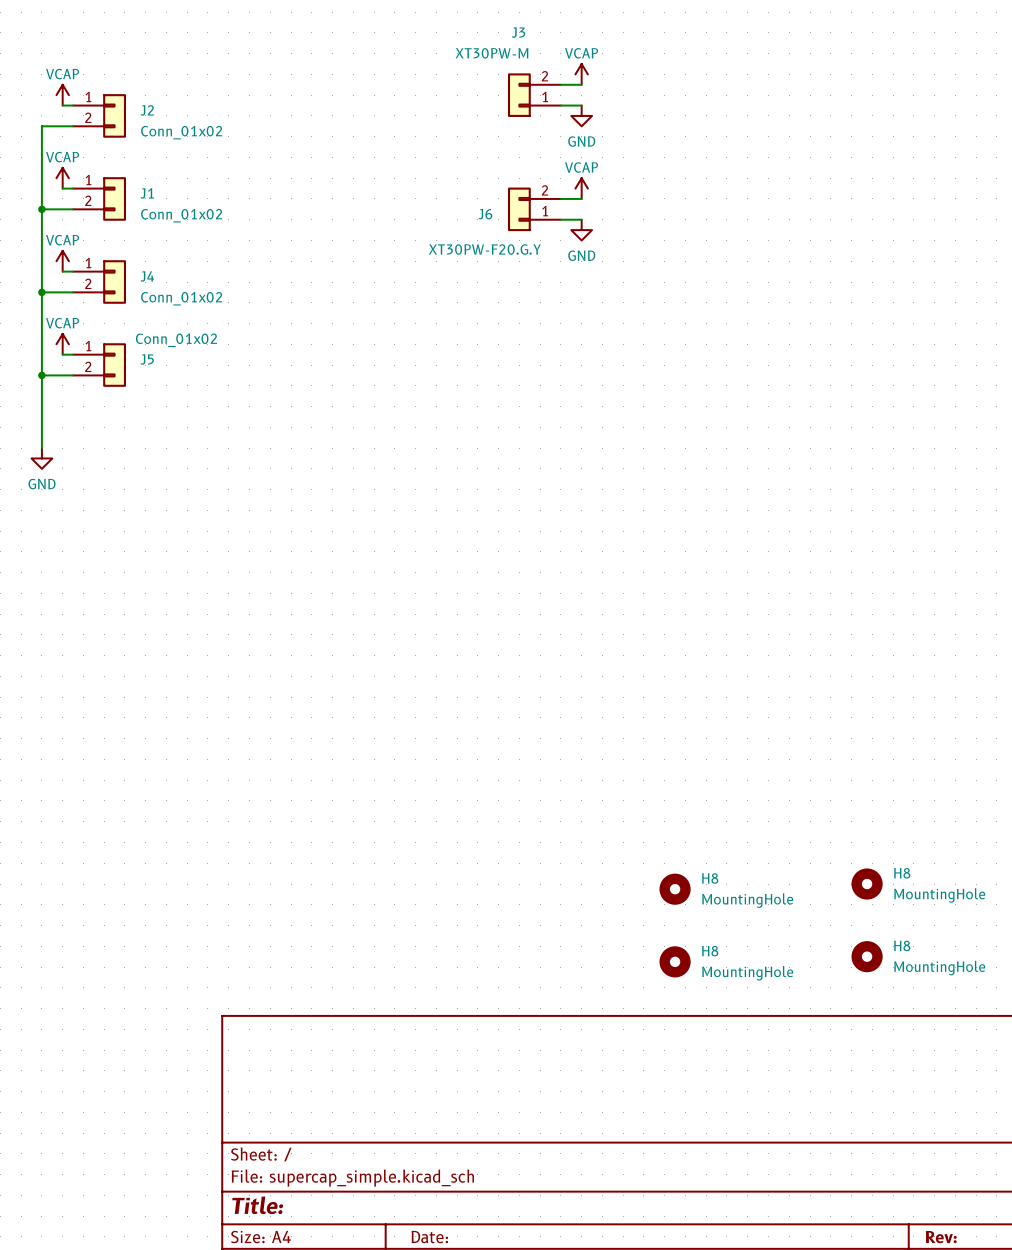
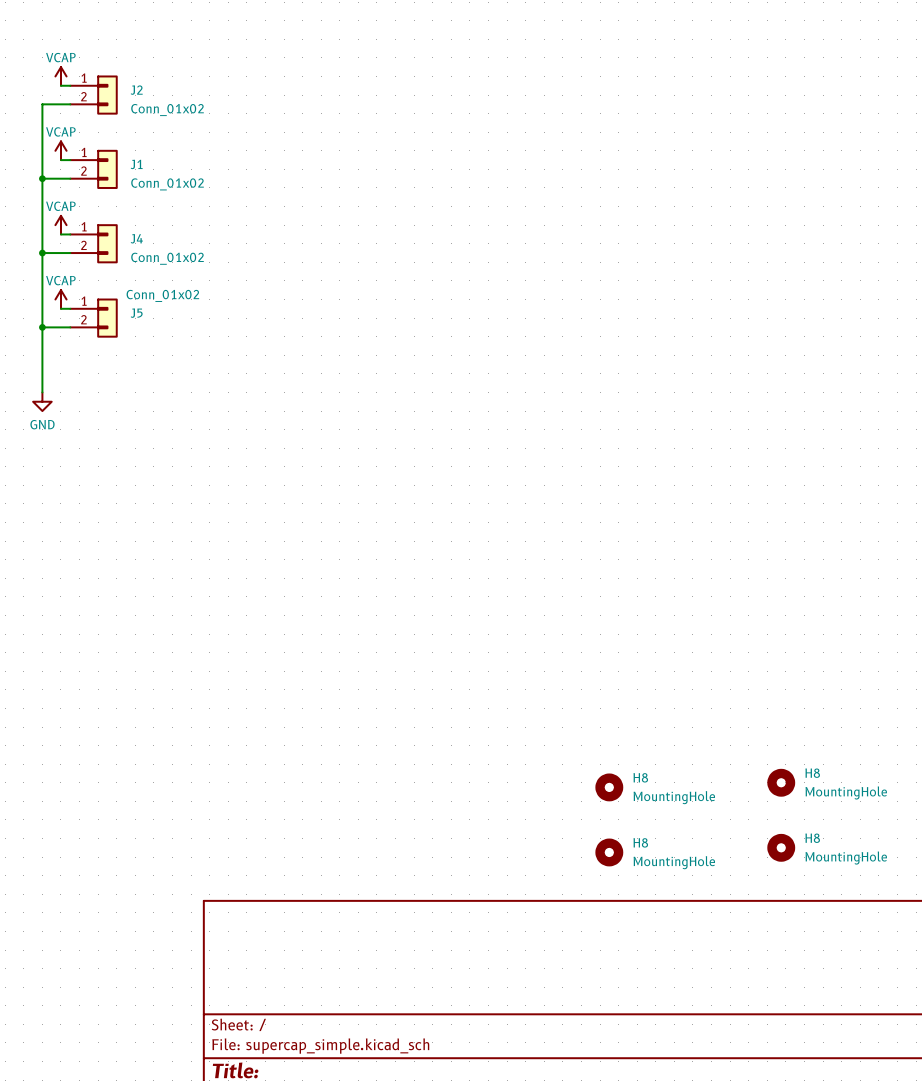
power symbol: VCAP (581, 74) -> none
wire: (560, 84) (581, 84) -> none
J3: XT30PW-M (534, 95) -> none
wire: (560, 105) (581, 105) -> none
power symbol: GND (581, 115) -> none
power symbol: VCAP (581, 188) -> none
wire: (560, 198) (581, 198) -> none
J6: XT30PW-F20.G.Y (534, 209) -> none
wire: (560, 219) (581, 219) -> none
power symbol: GND (581, 230) -> none

